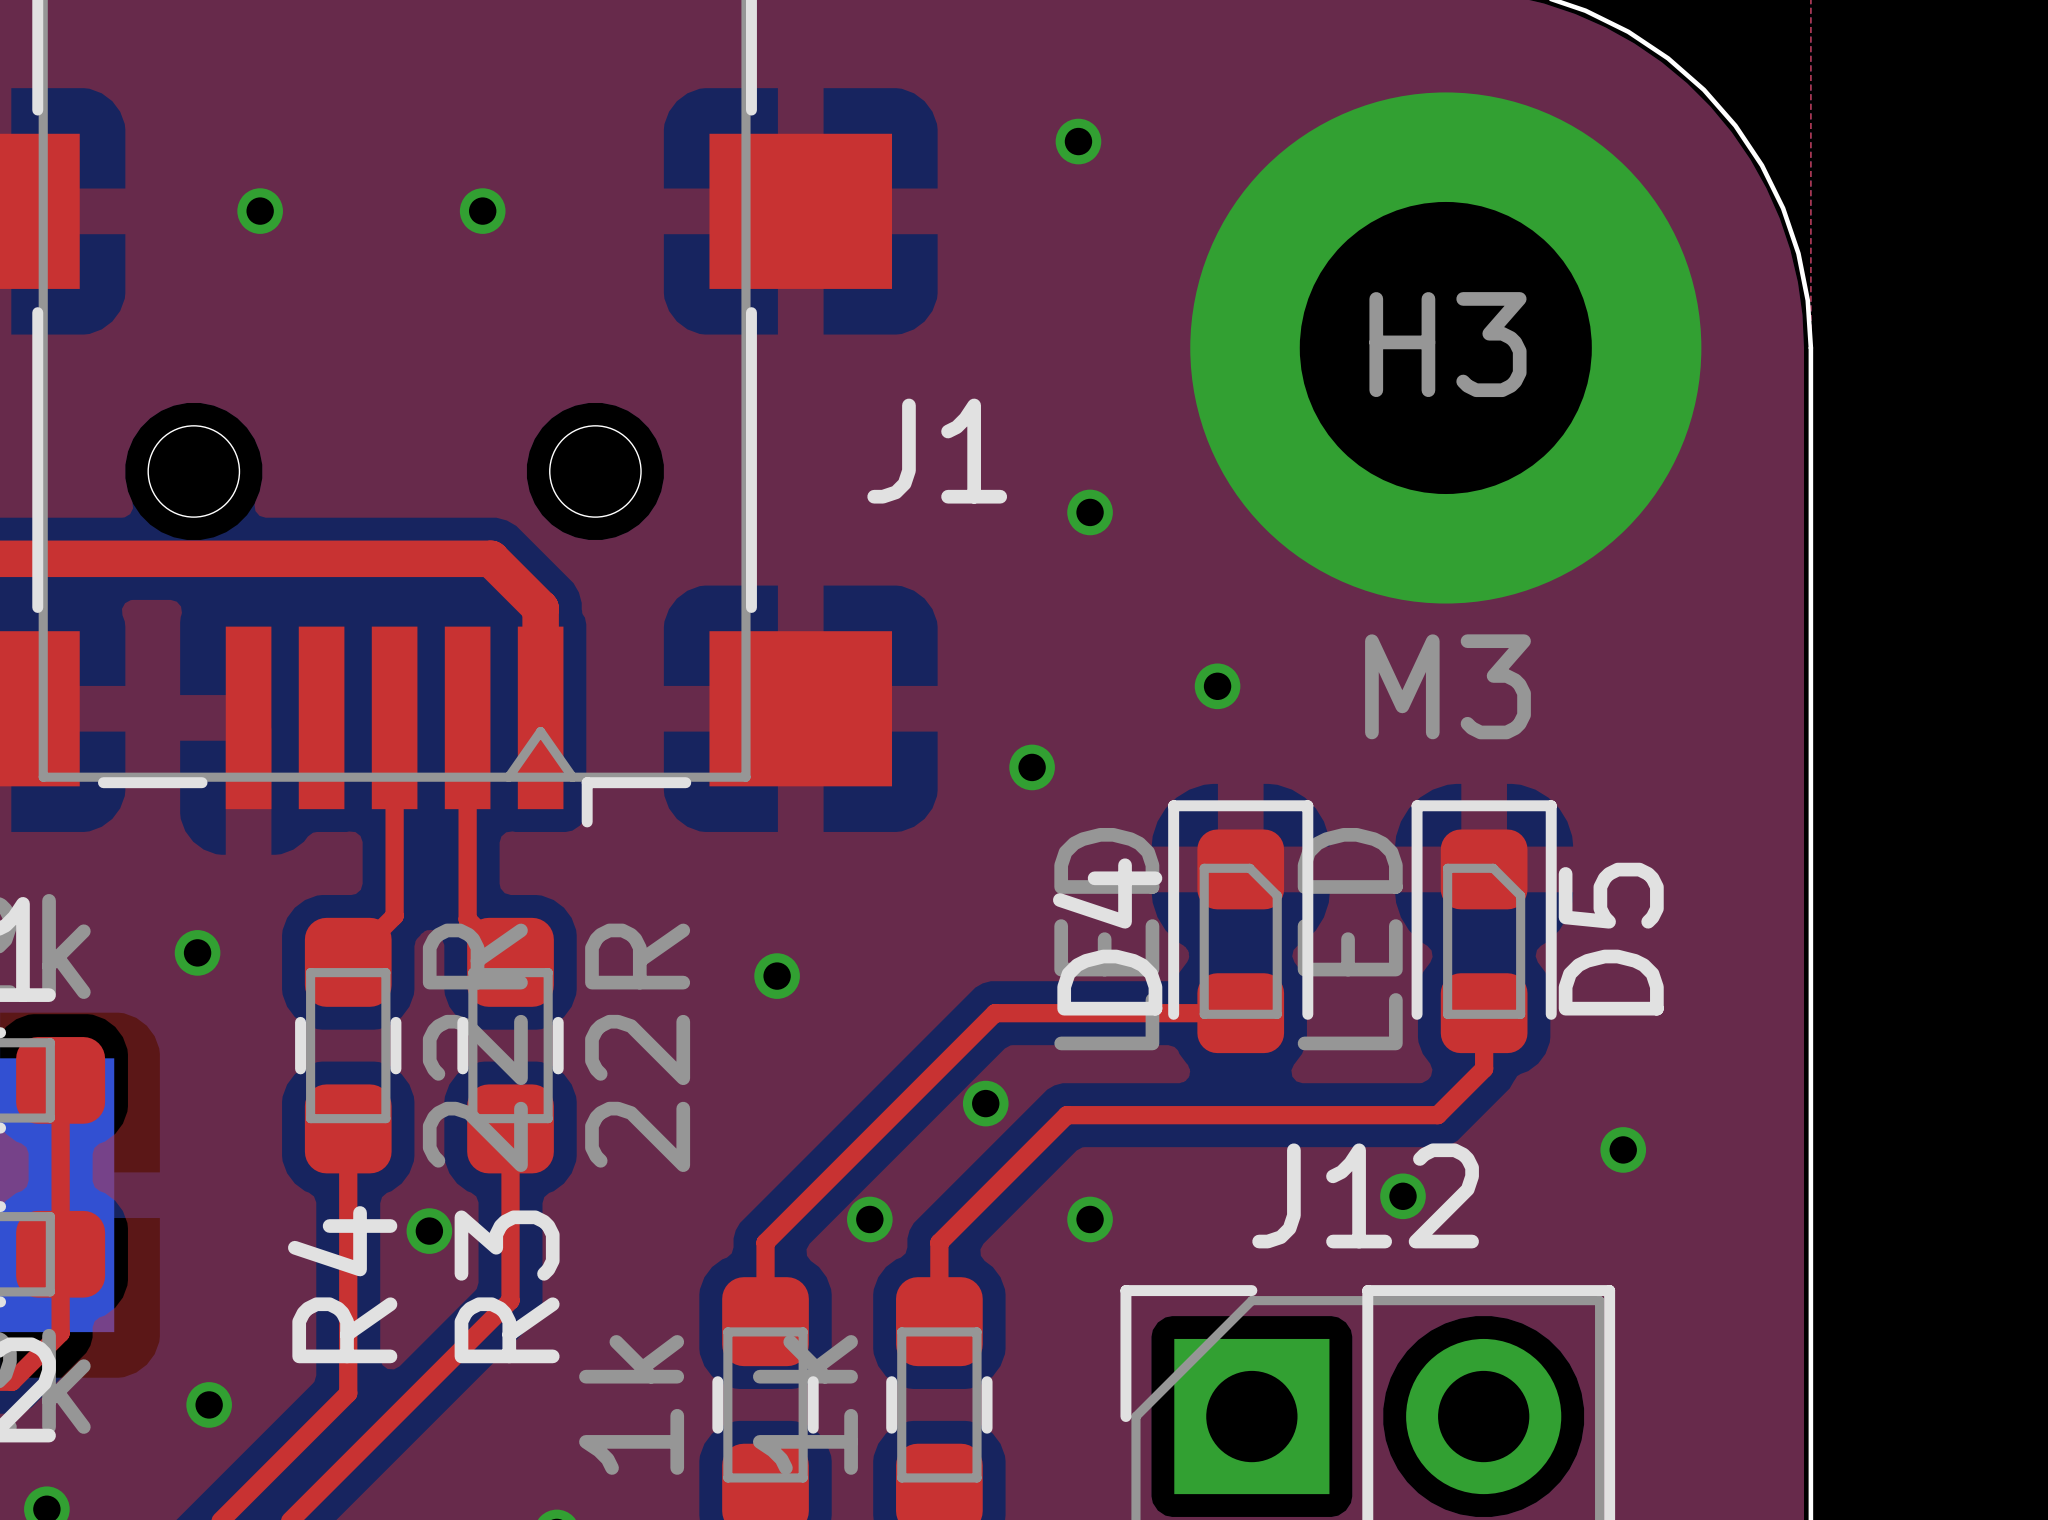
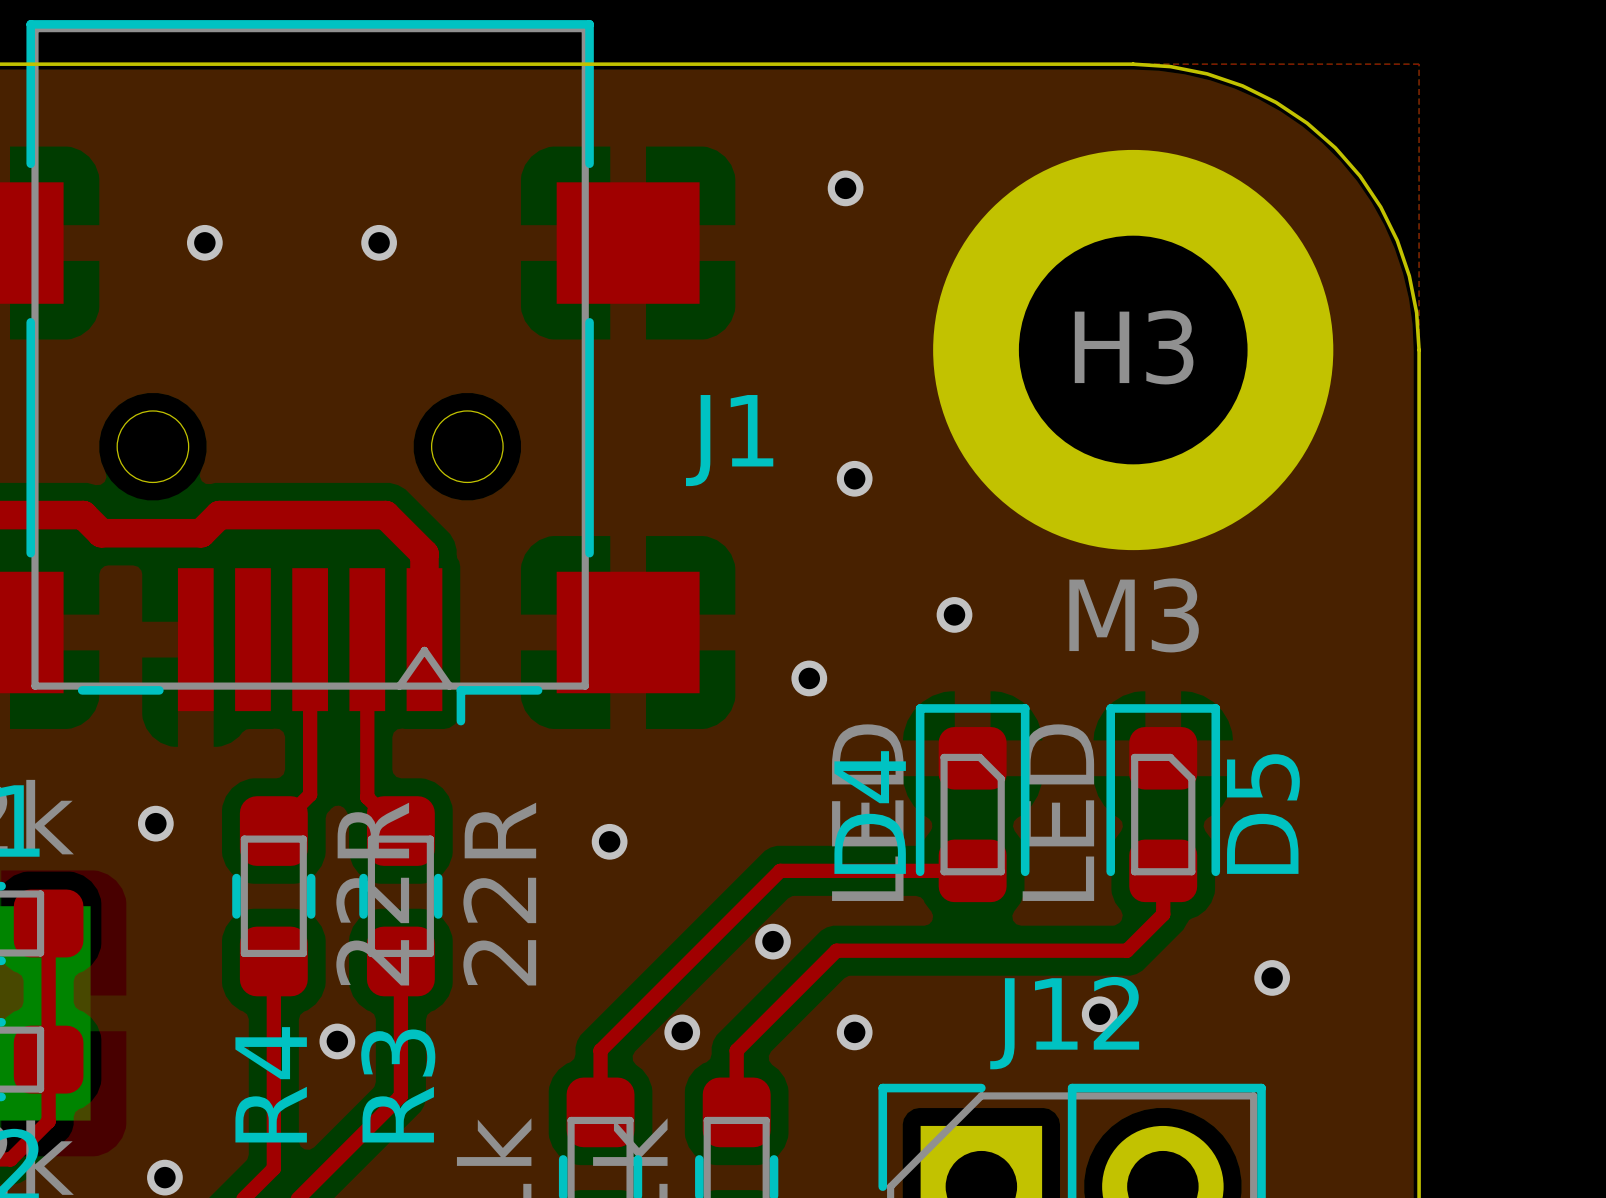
top track: (104, 558) (278, 558) -> (83, 515) (101, 533) (201, 533) (219, 515)

